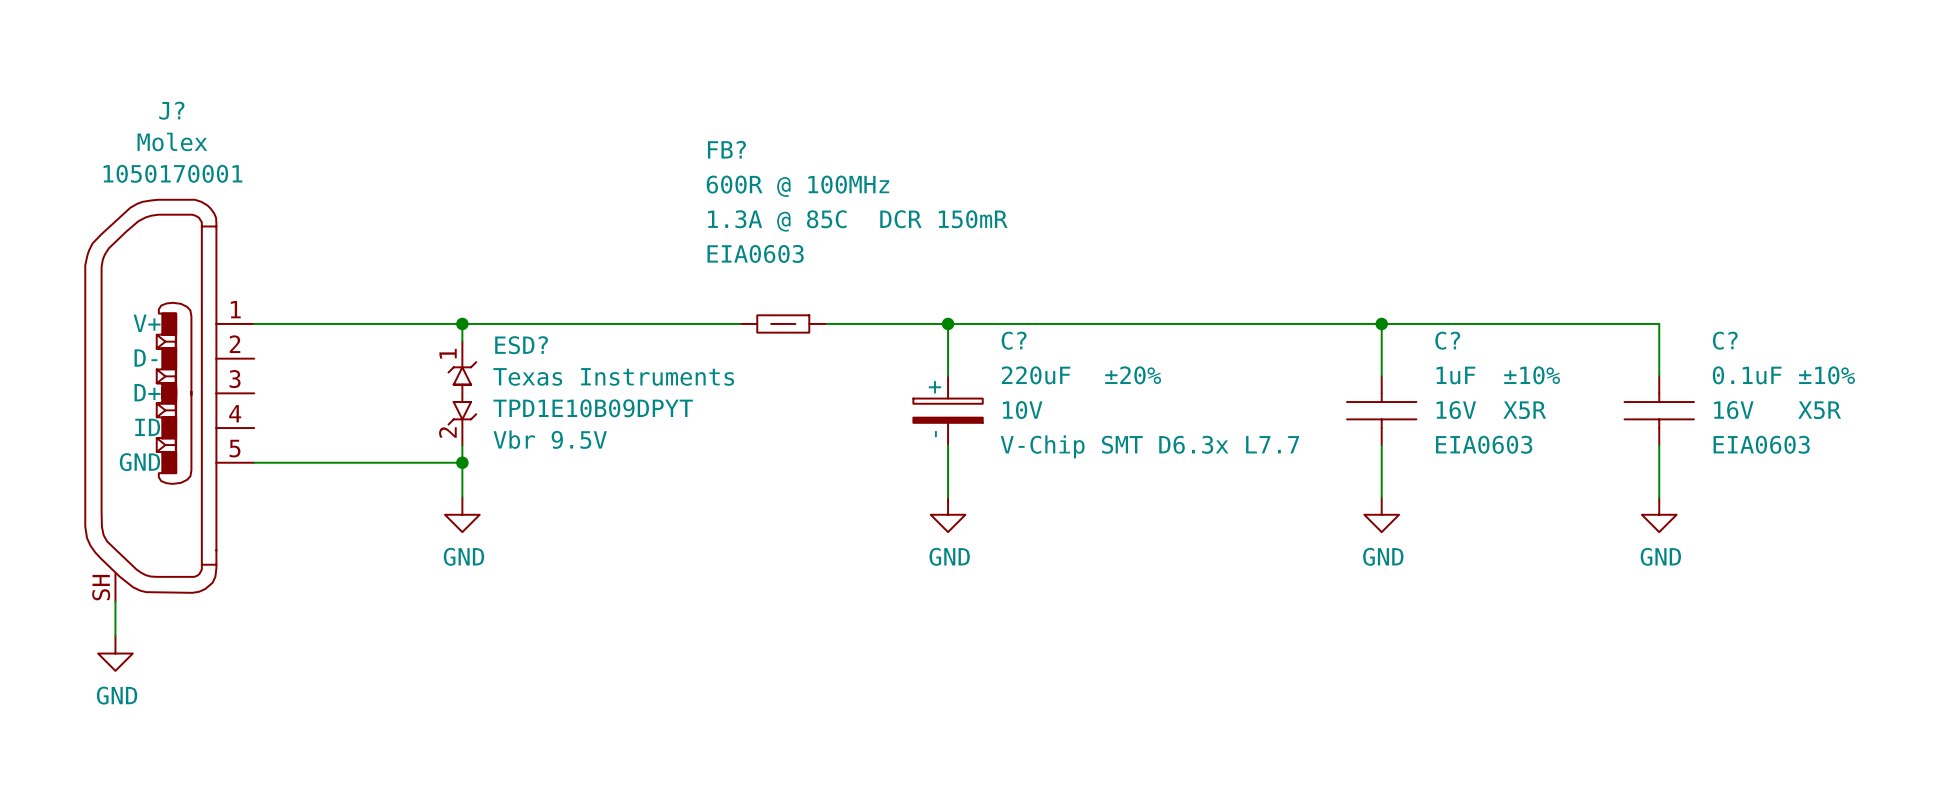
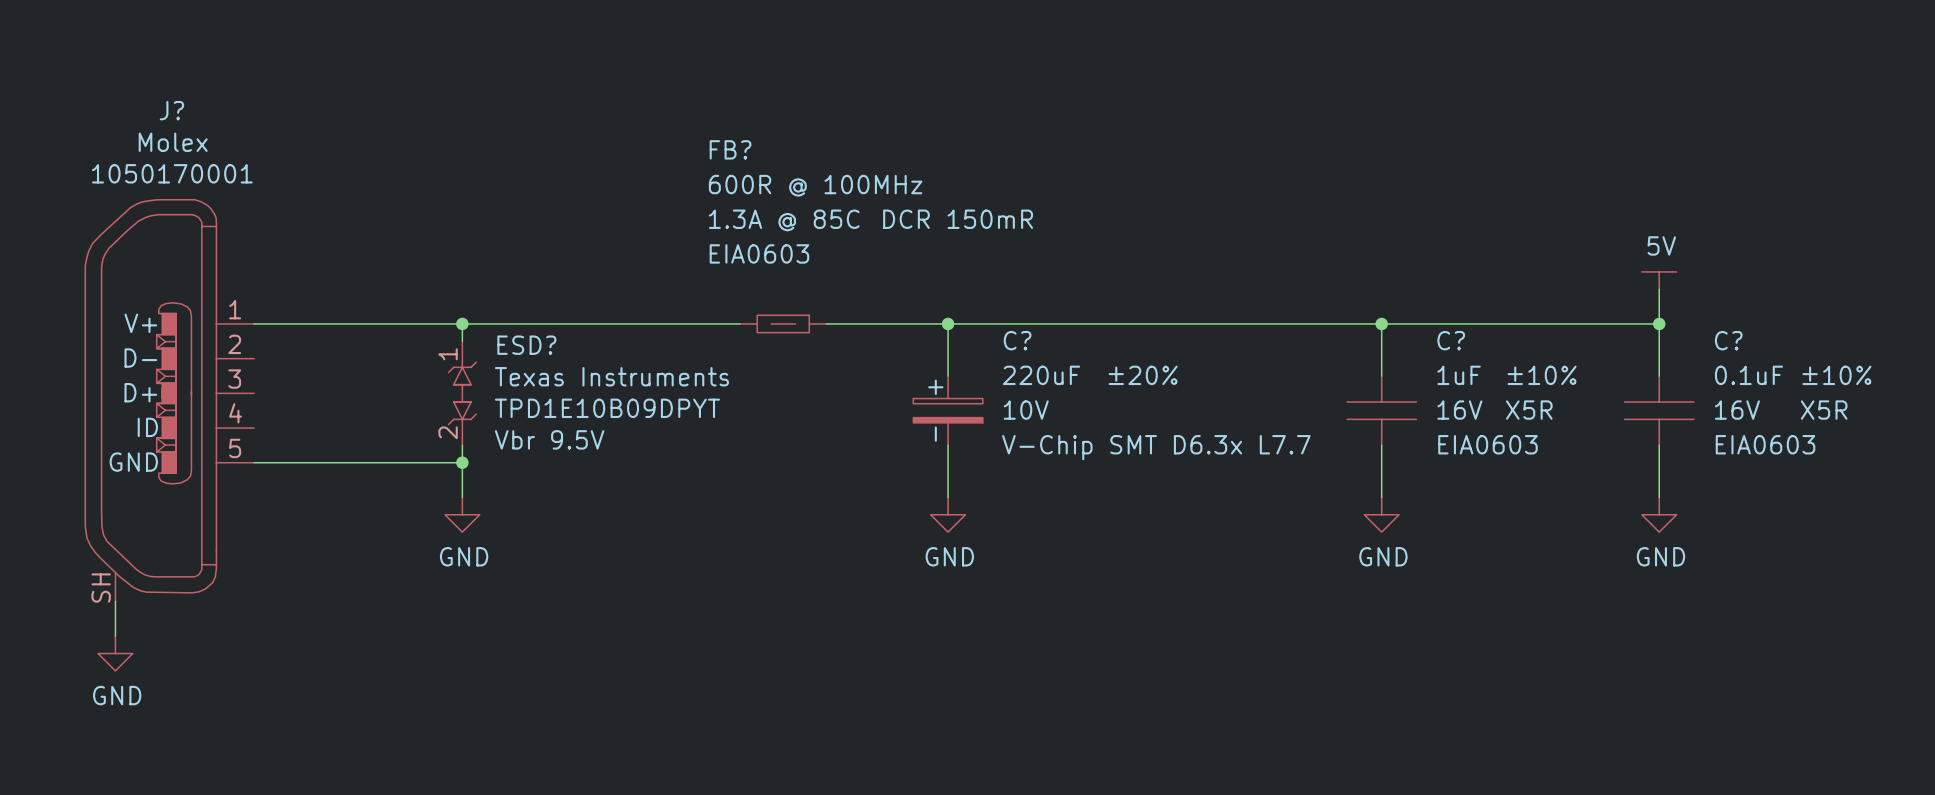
power symbol: none -> 5V (1659, 280)
wire: none -> (1659, 289) (1659, 323)
junction: none -> (1659, 323)

